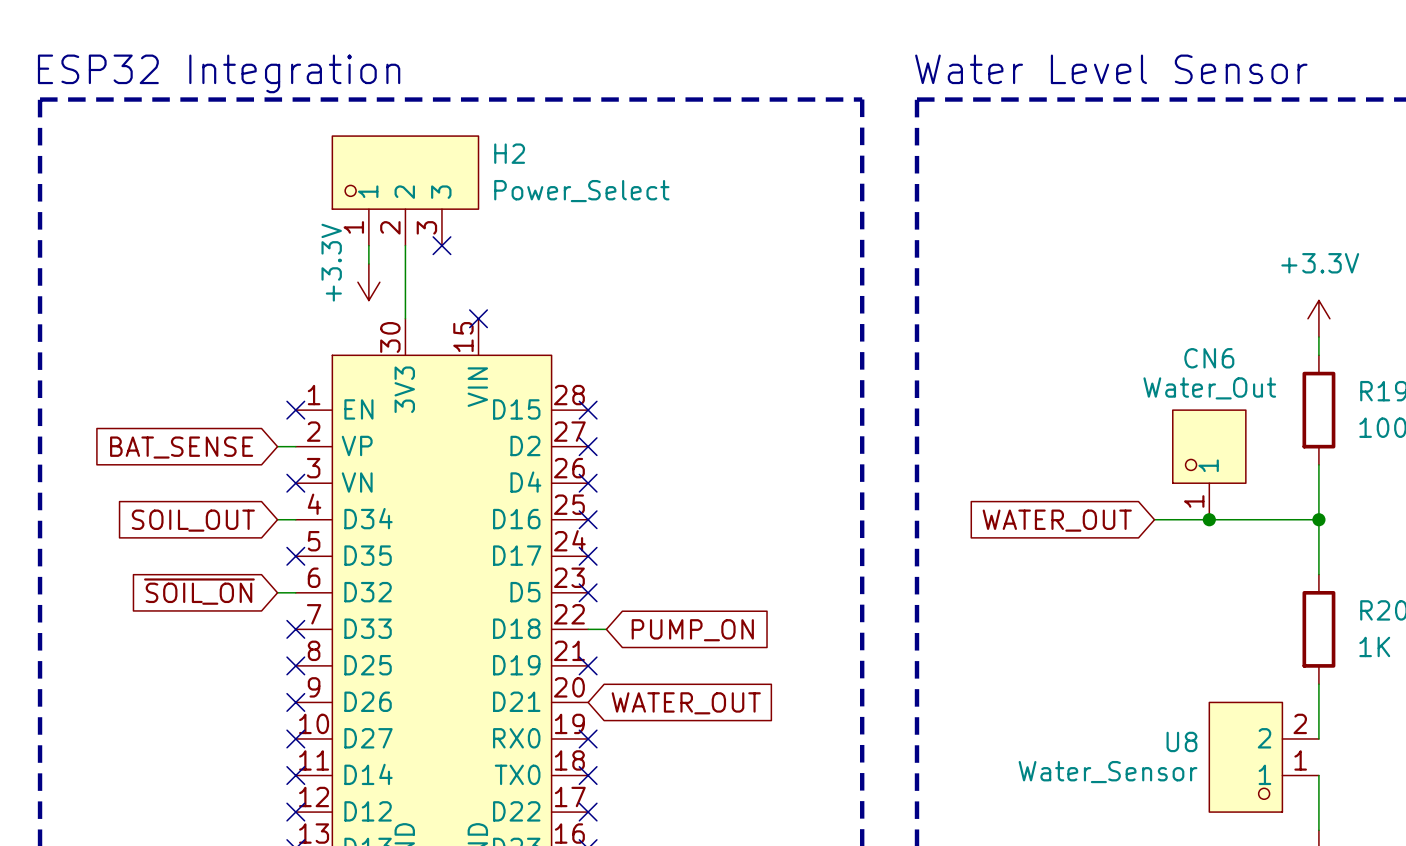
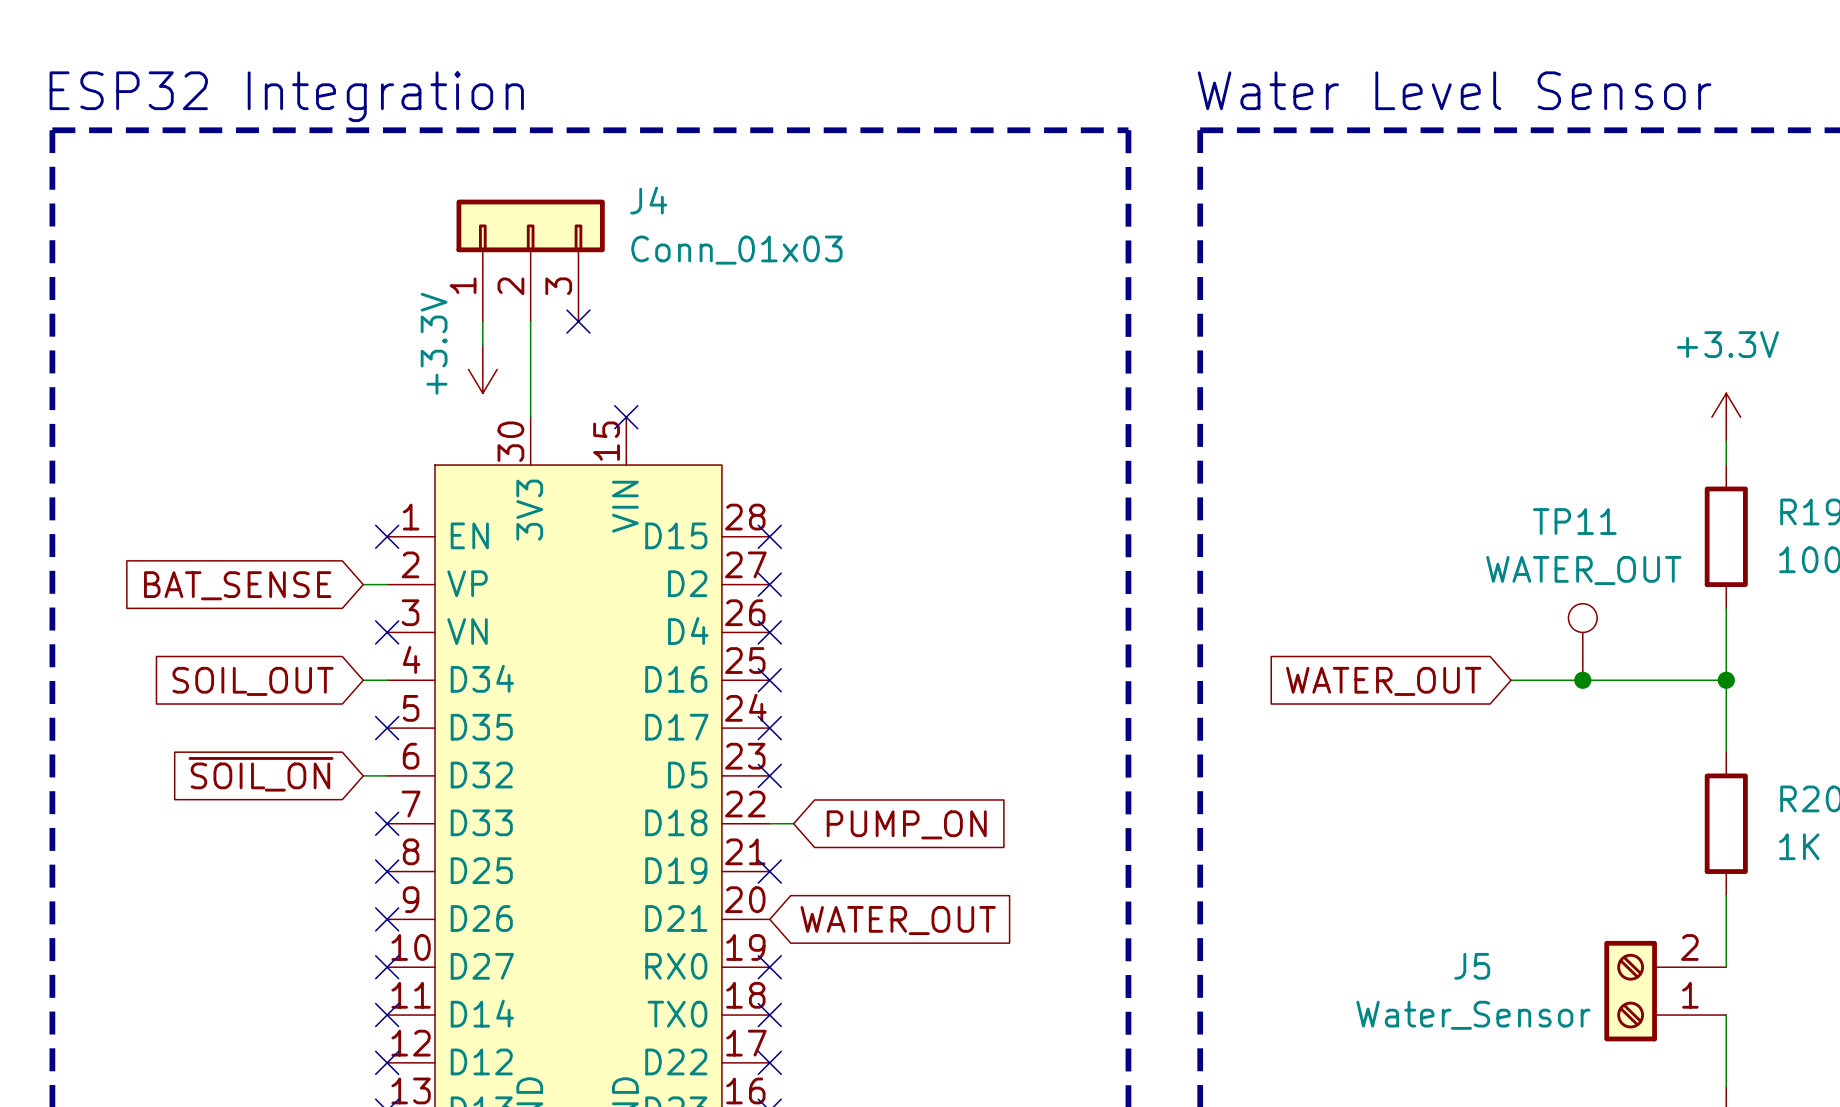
H2: Power_Select (405, 190) -> none
J4: none -> Conn_01x03 (530, 260)
CN6: Water_Out (1209, 464) -> none
TP11: none -> WATER_OUT (1582, 642)
U8: Water_Sensor (1264, 757) -> none
J5: none -> Water_Sensor (1665, 991)

